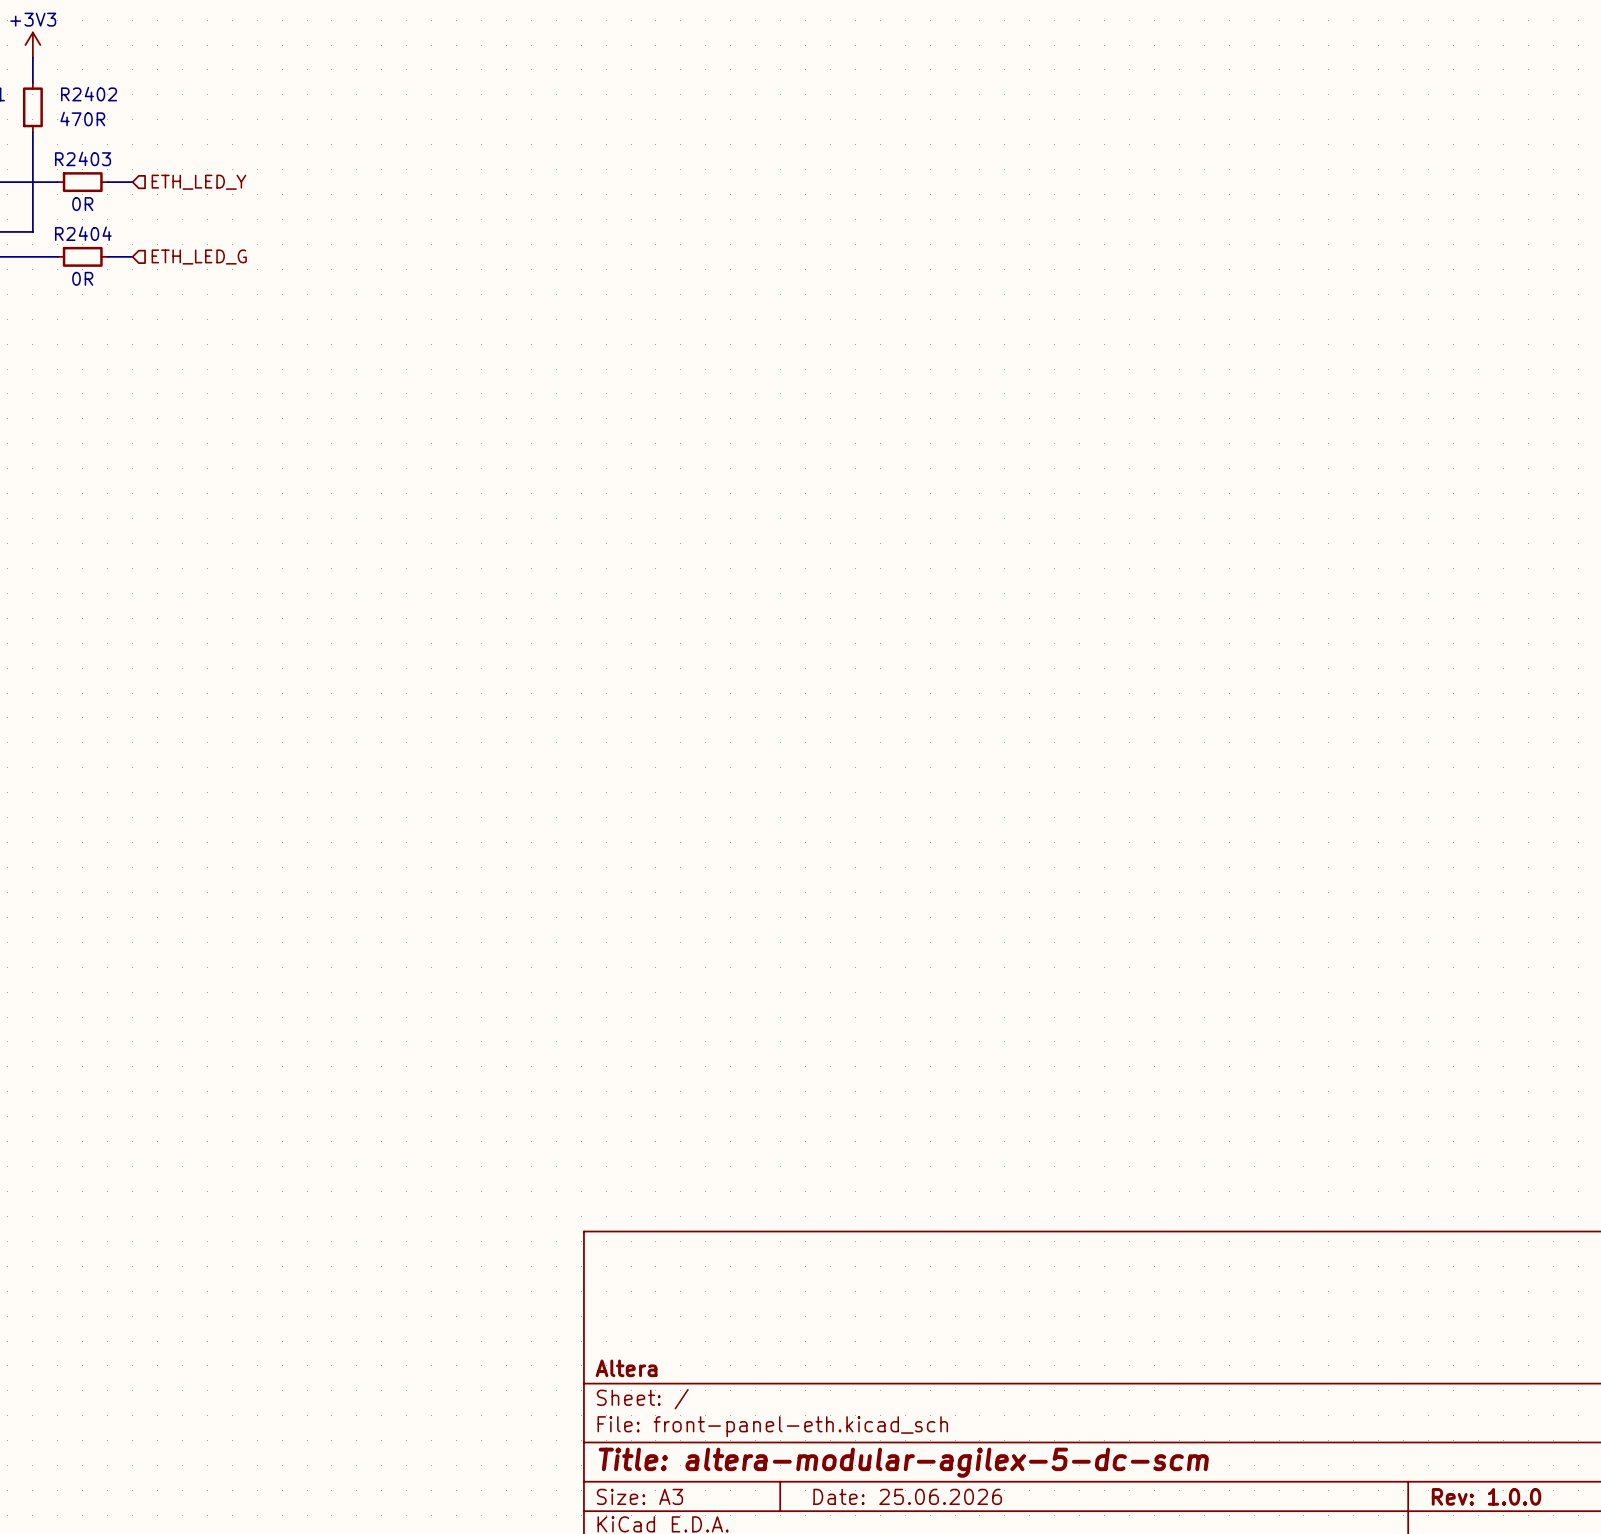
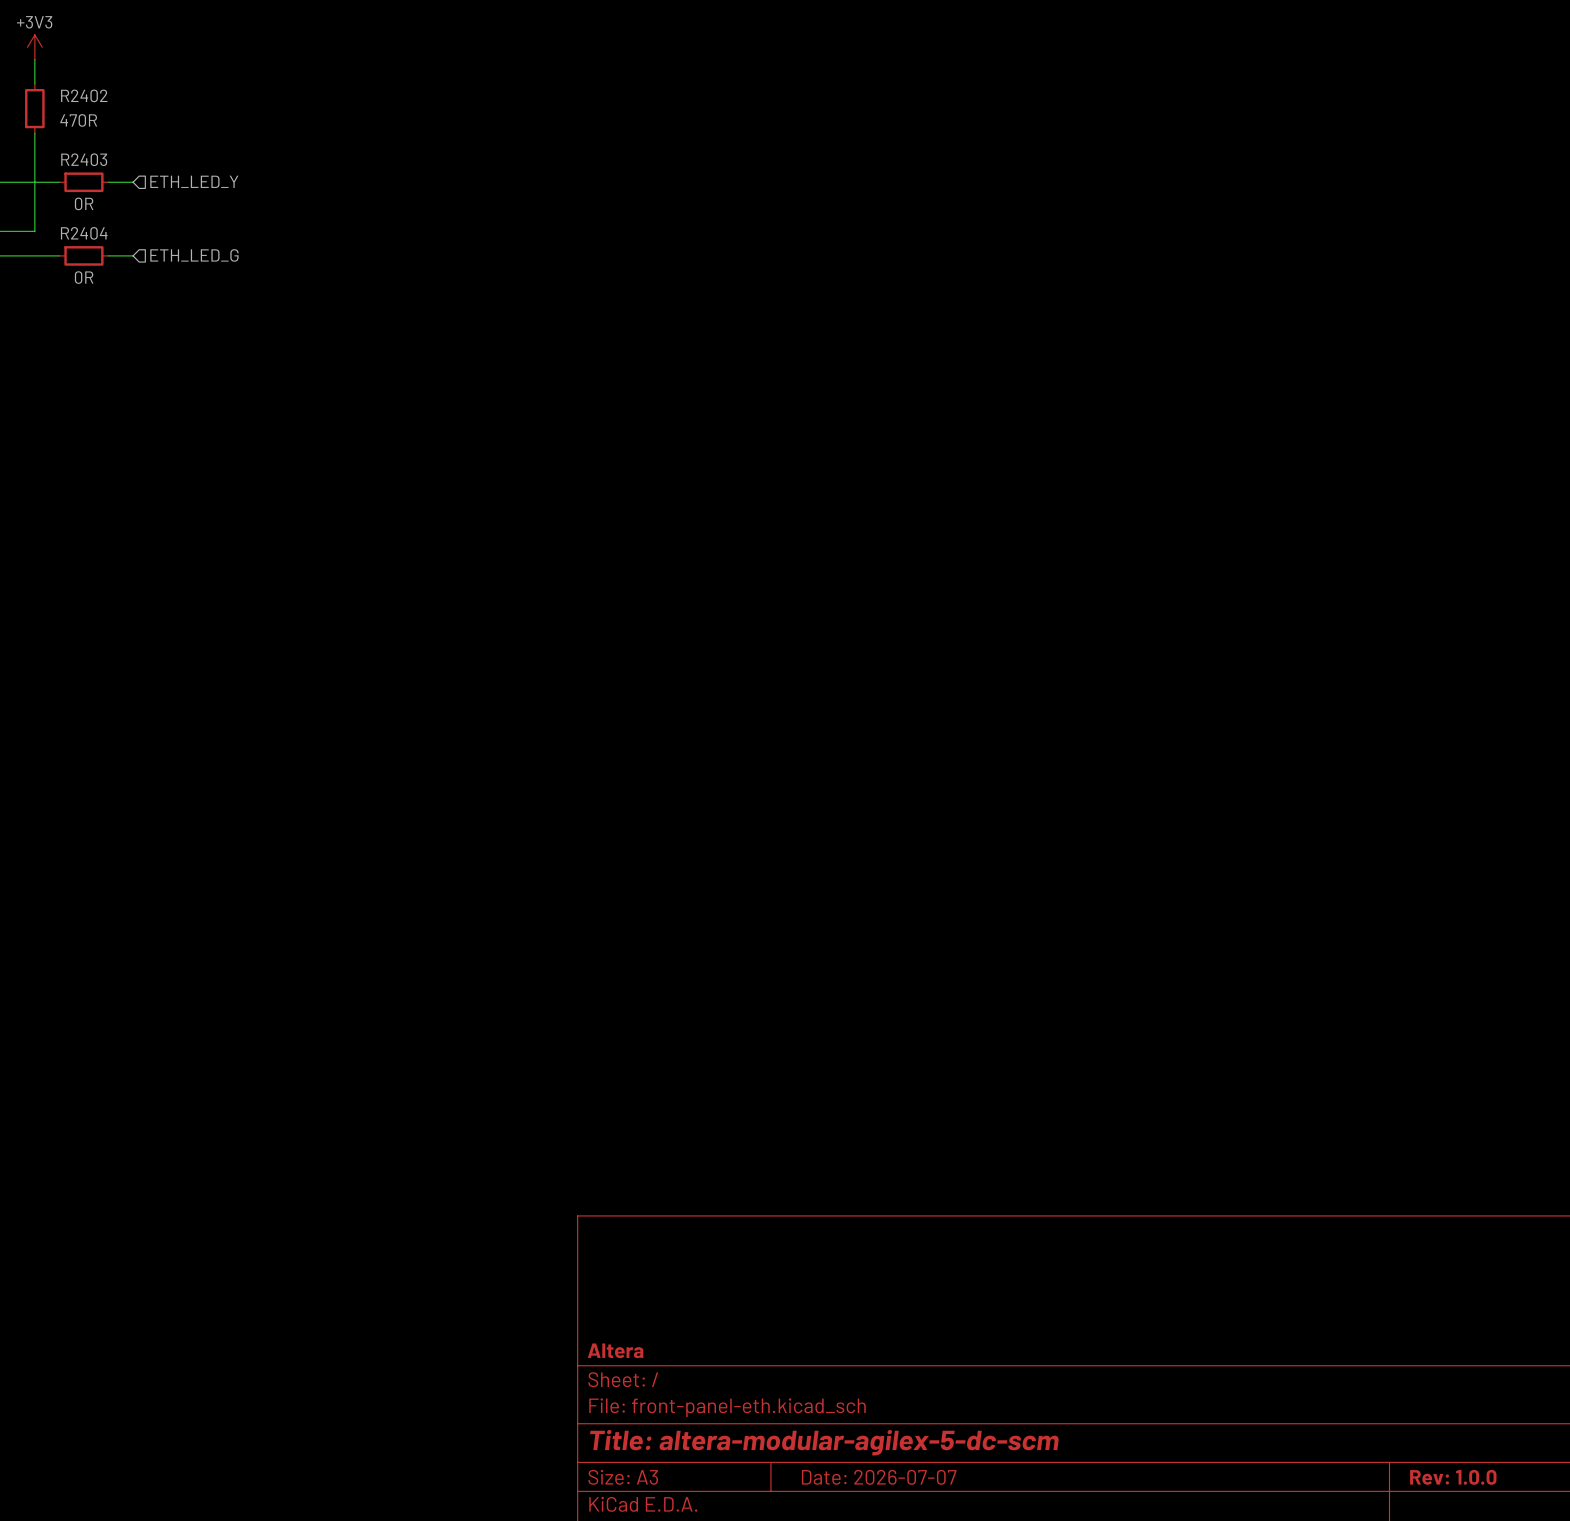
title block: Date: 25.06.2026 (907, 1496) -> Date: 2026-07-07 (879, 1477)

